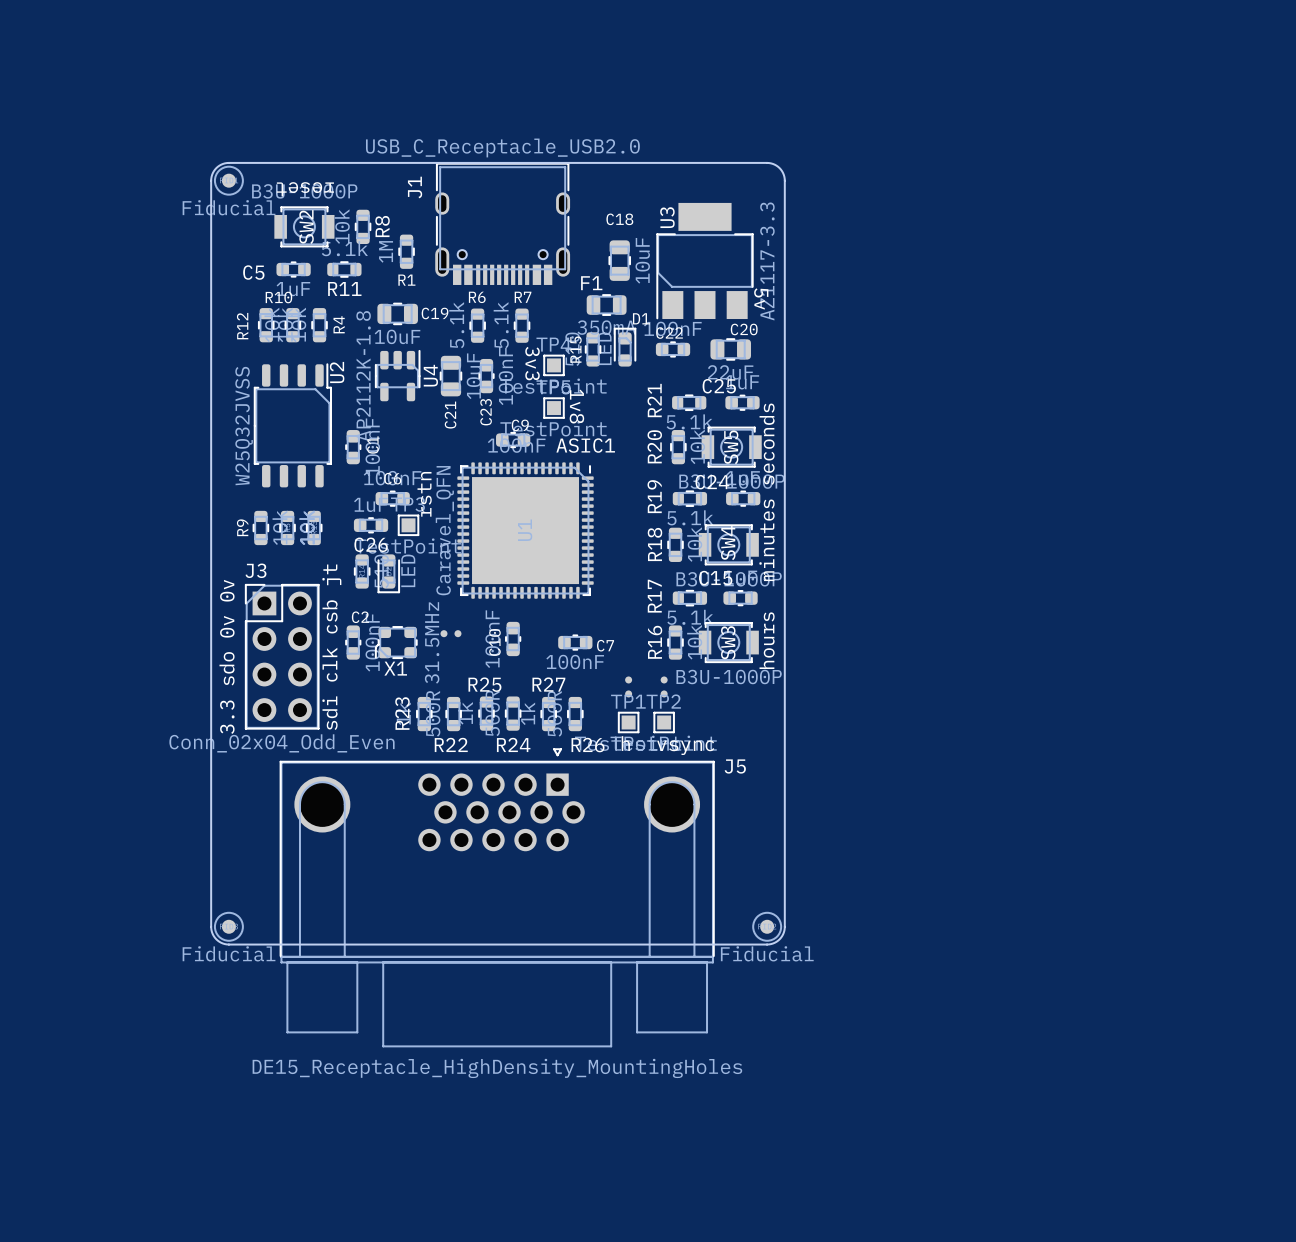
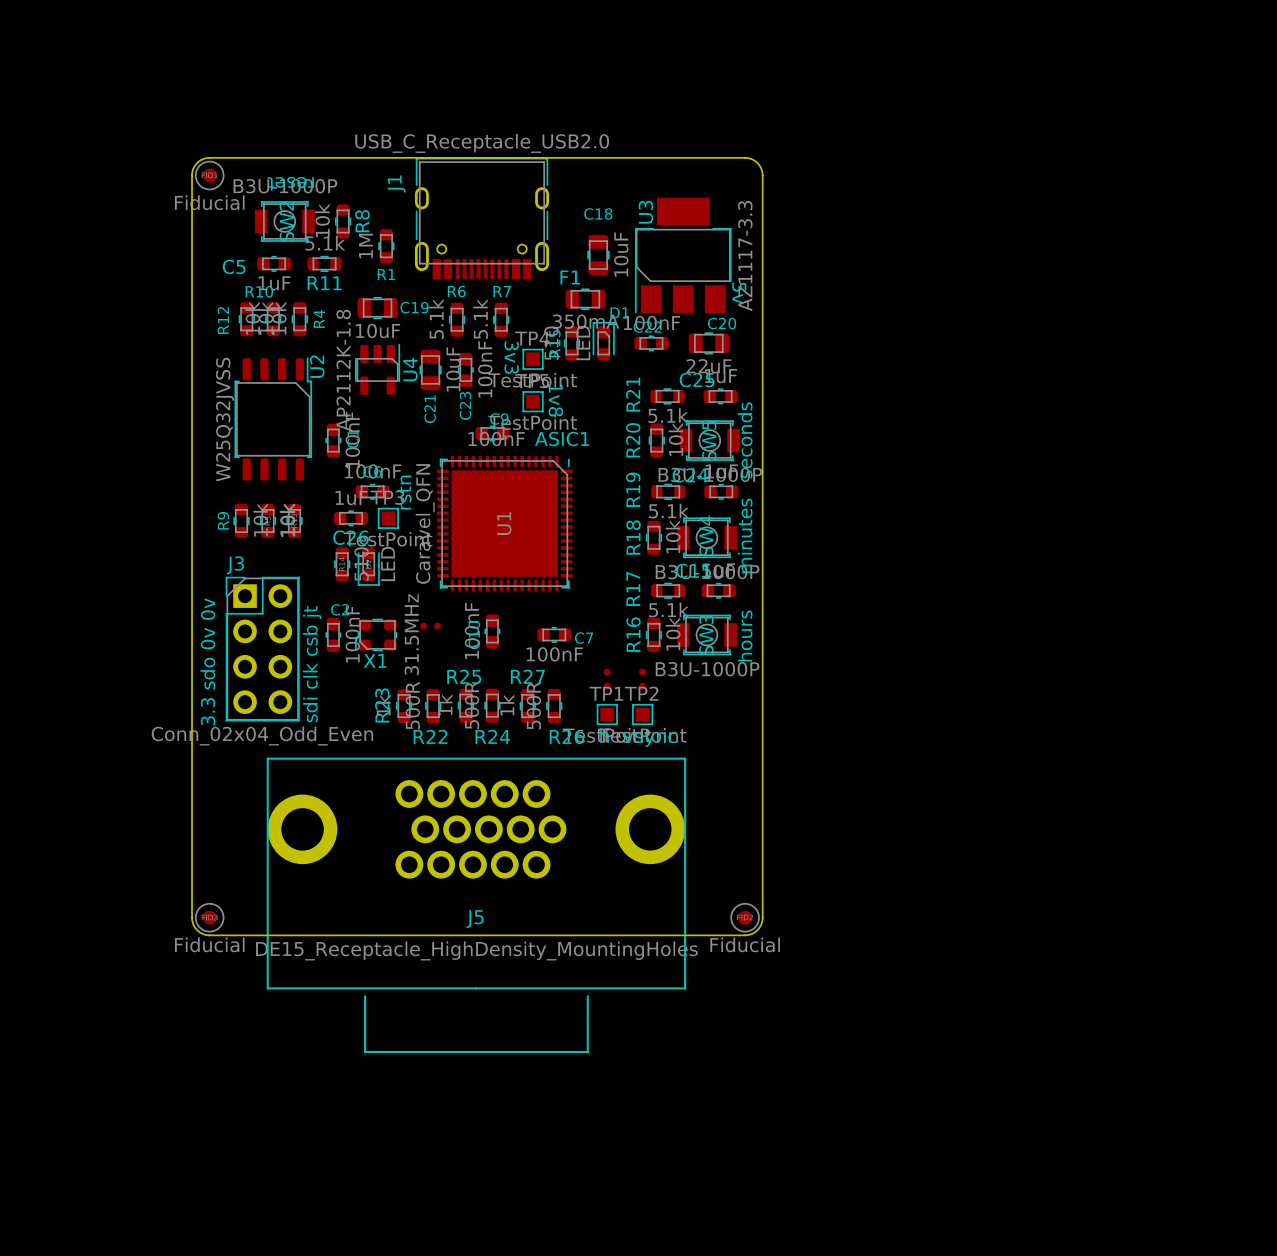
J5 footprint: [279, 748, 715, 1048] -> [266, 757, 687, 1054]
J5 name position: J5 (735, 766) -> J5 (475, 919)
J5 value position: DE15_Receptacle_HighDensity_MountingHoles (497, 1068) -> DE15_Receptacle_HighDensity_MountingHoles (476, 950)

